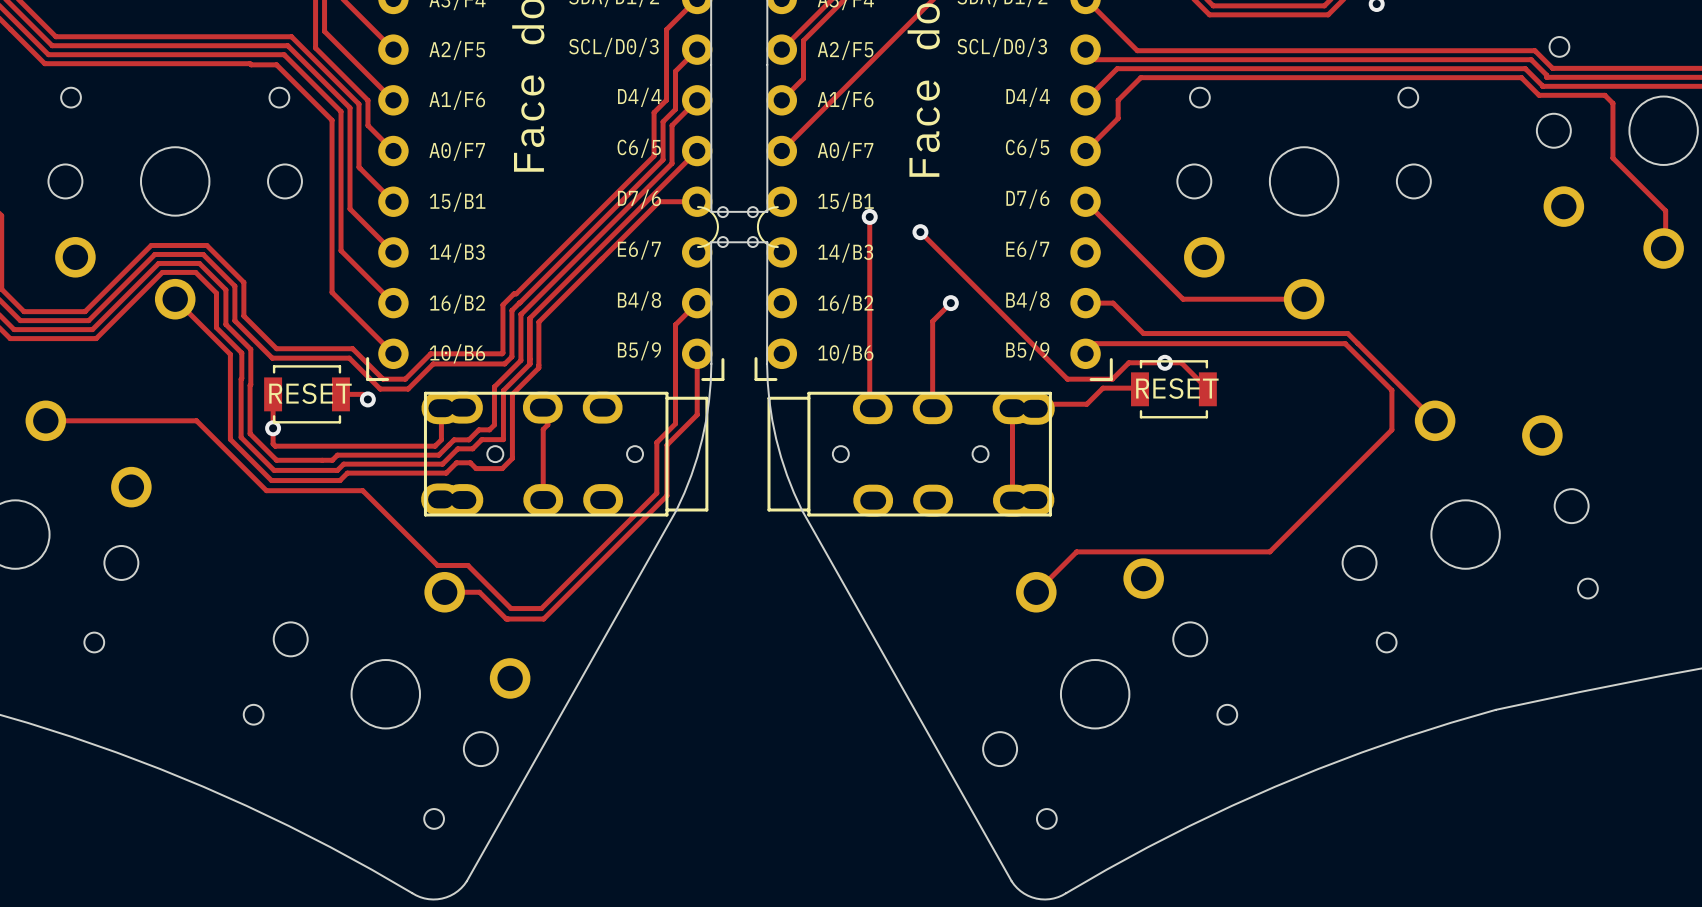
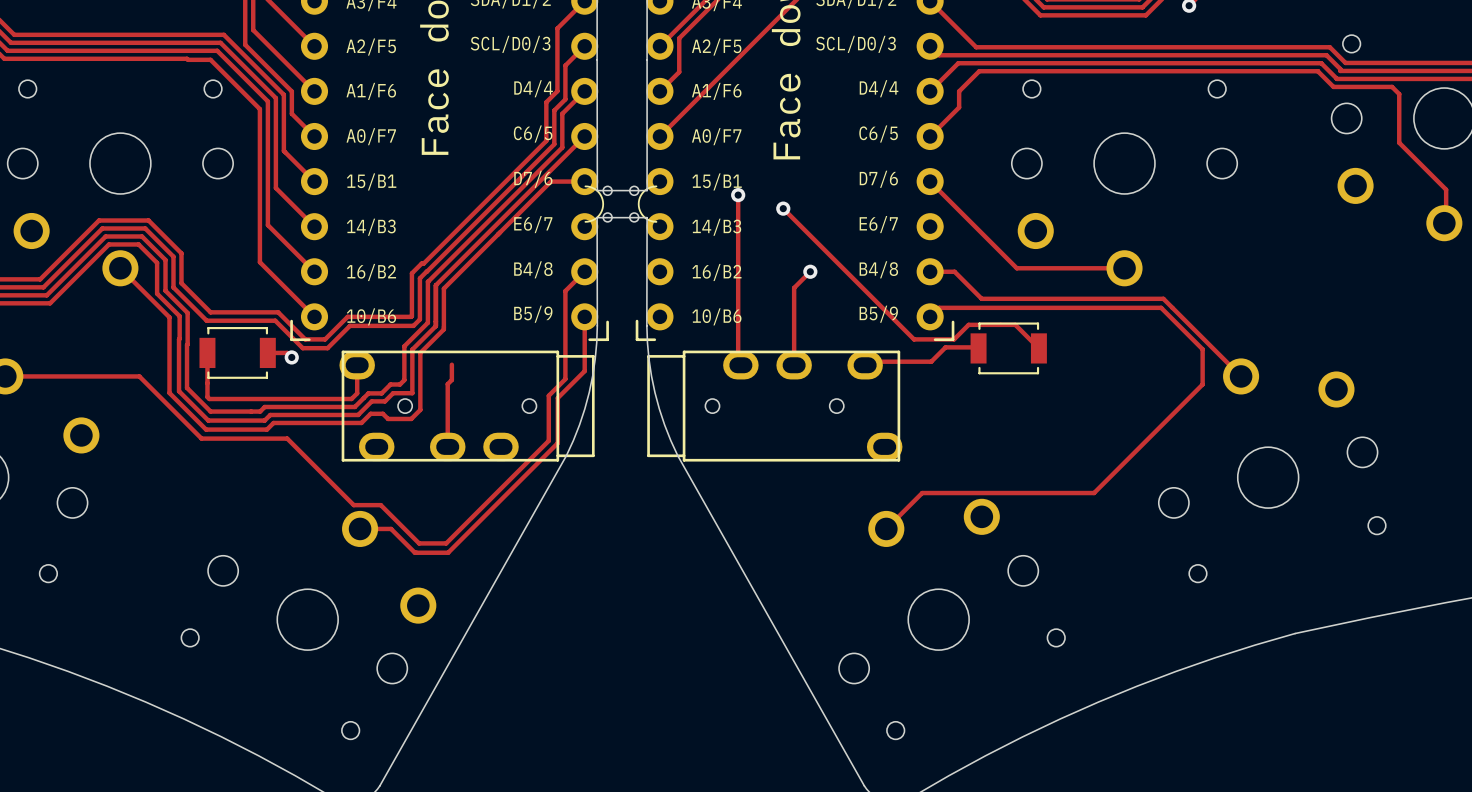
via: (1164, 362) -> none
part: (1177, 388) -> none
part footprint: [421, 391, 709, 517] -> [339, 350, 595, 462]
part footprint: [767, 391, 1055, 517] -> [647, 350, 903, 462]
part: (310, 393) -> none
track: (1012, 408) (1012, 500) -> none
via: (273, 428) -> none

